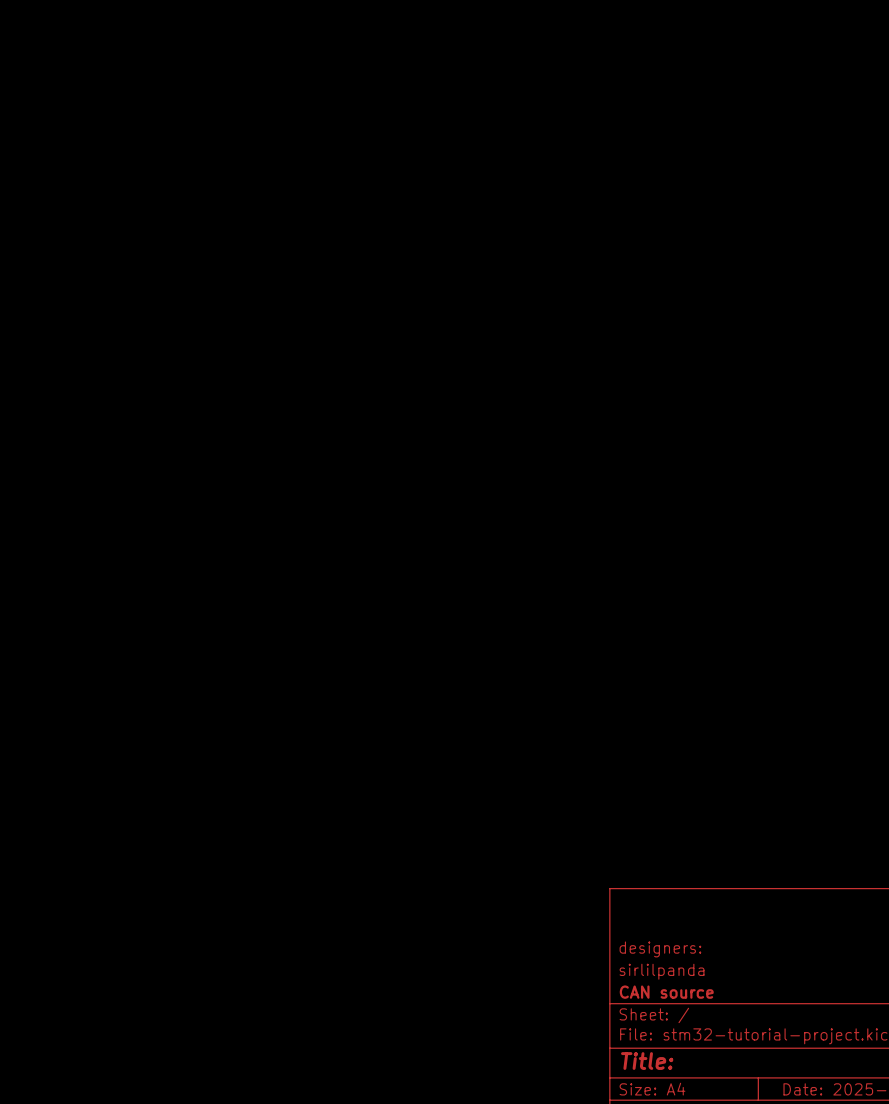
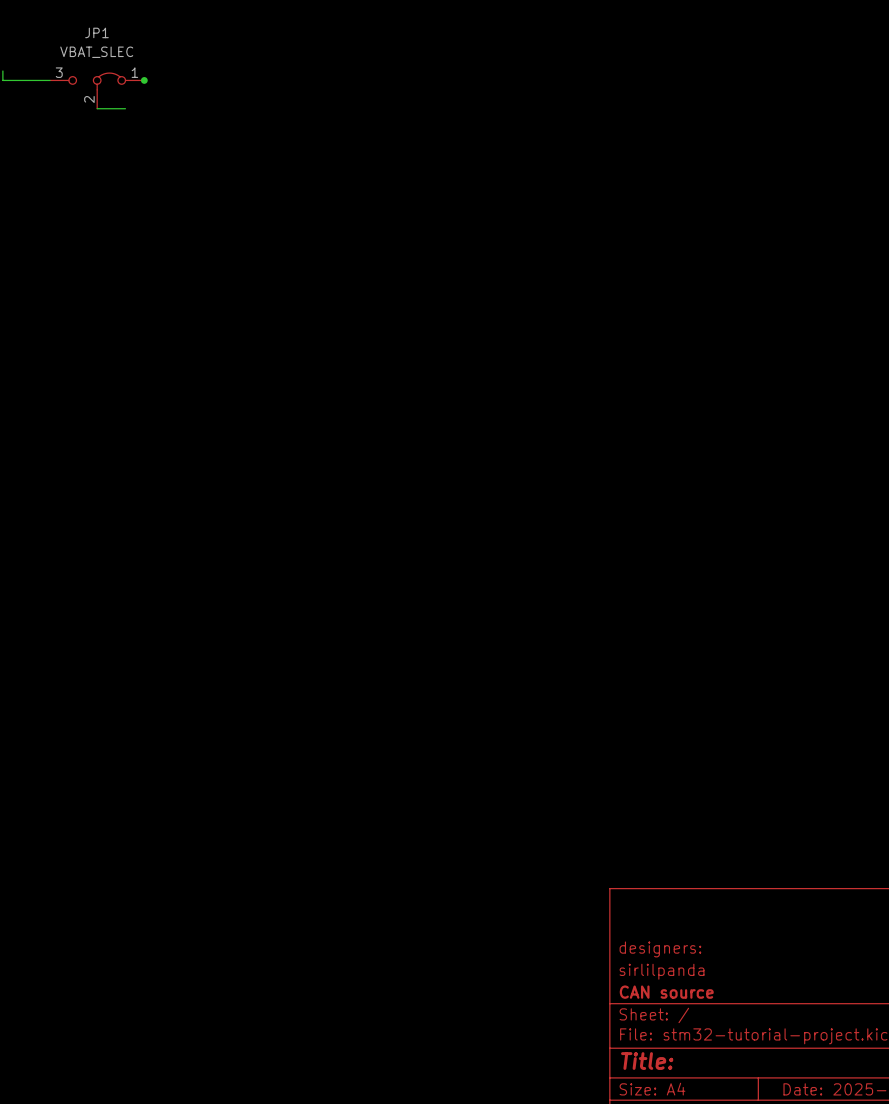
wire: none -> (2, 71) (2, 80) (50, 80)
junction: none -> (144, 80)
JP1: none -> VBAT_SLEC (97, 90)
wire: none -> (97, 108) (125, 108)

